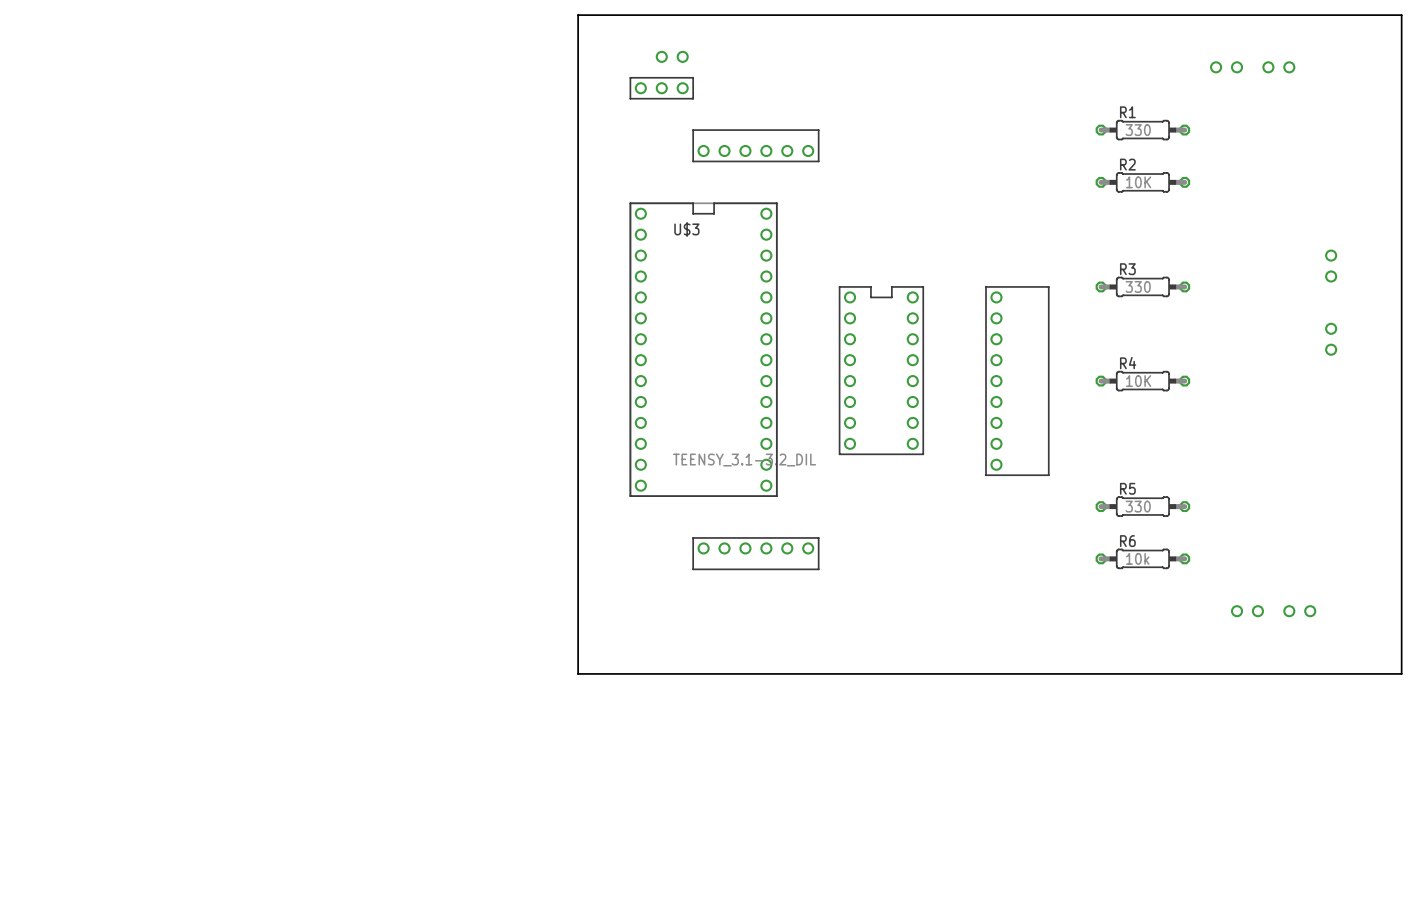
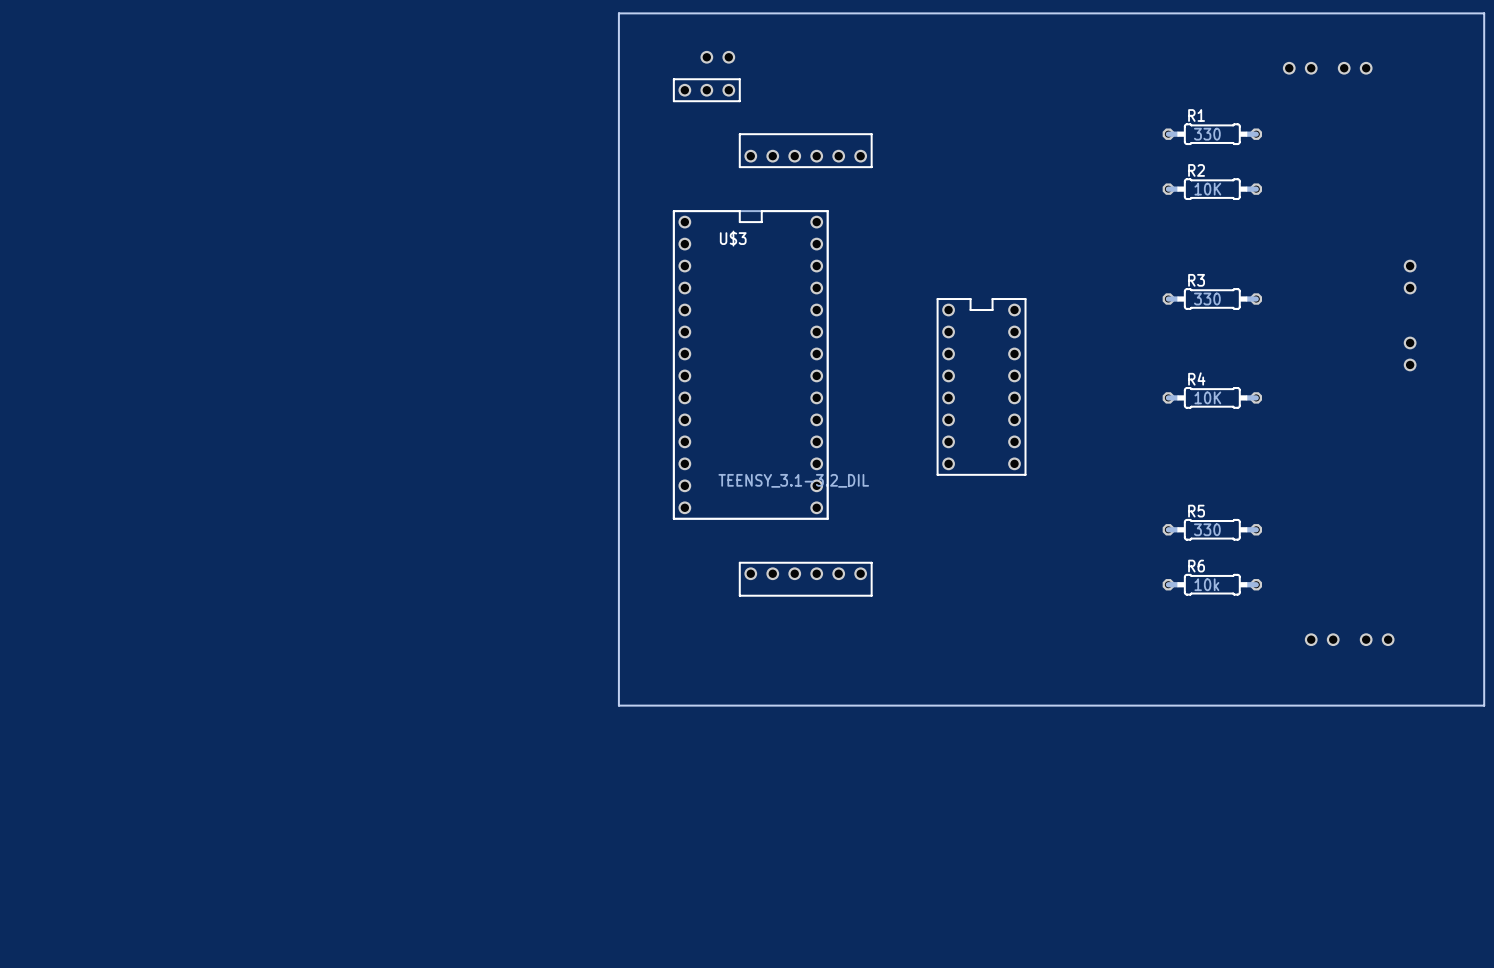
part position: (881, 370) -> (981, 386)
part: (1017, 381) -> none

